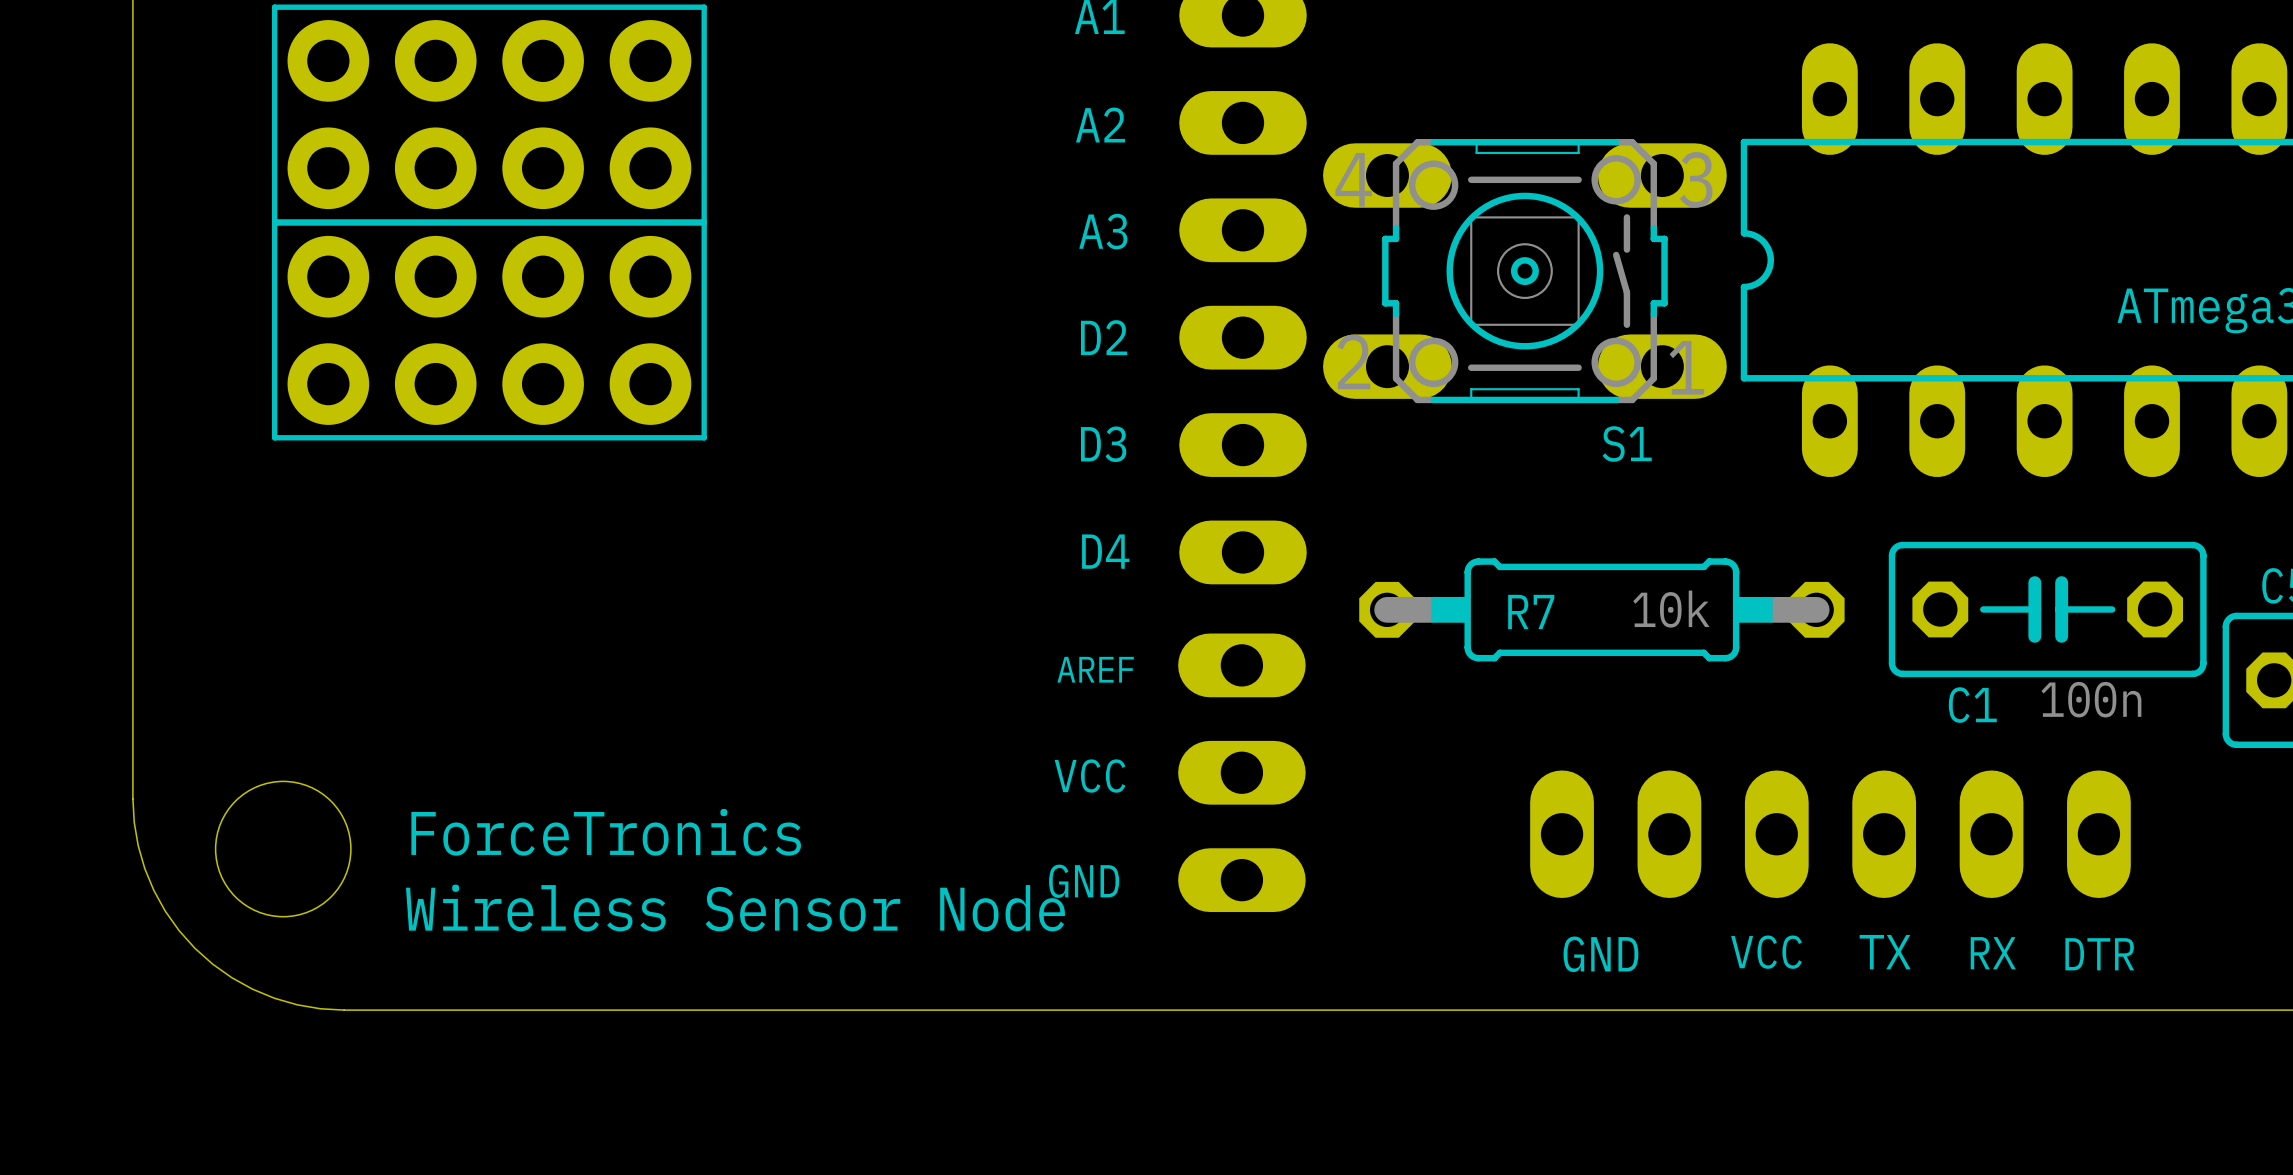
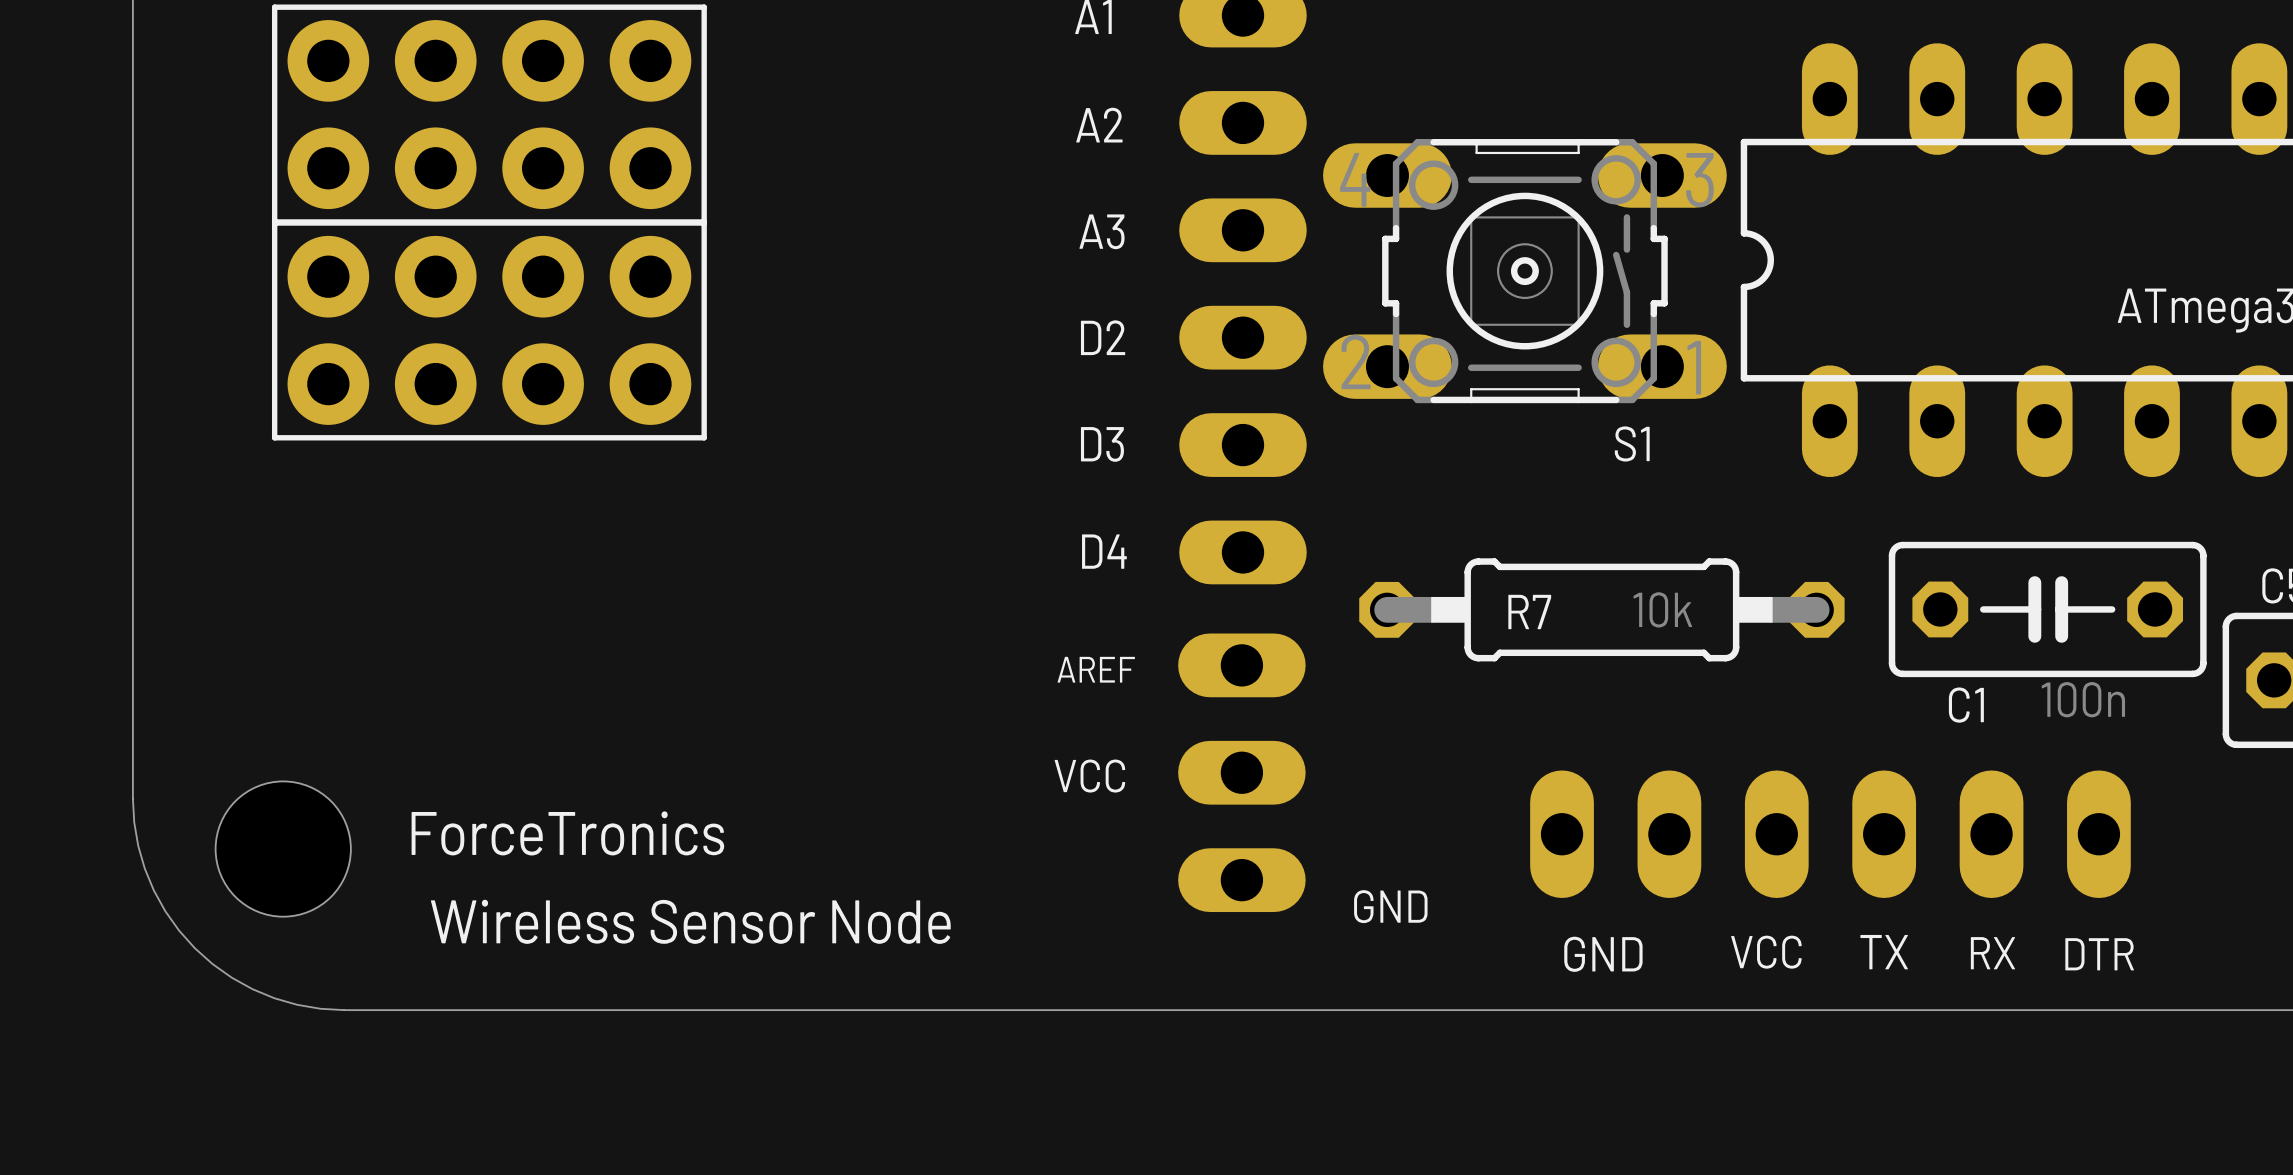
text position: GND (1084, 881) -> GND (1390, 906)
text position: Wireless Sensor Node (735, 908) -> Wireless Sensor Node (690, 921)

